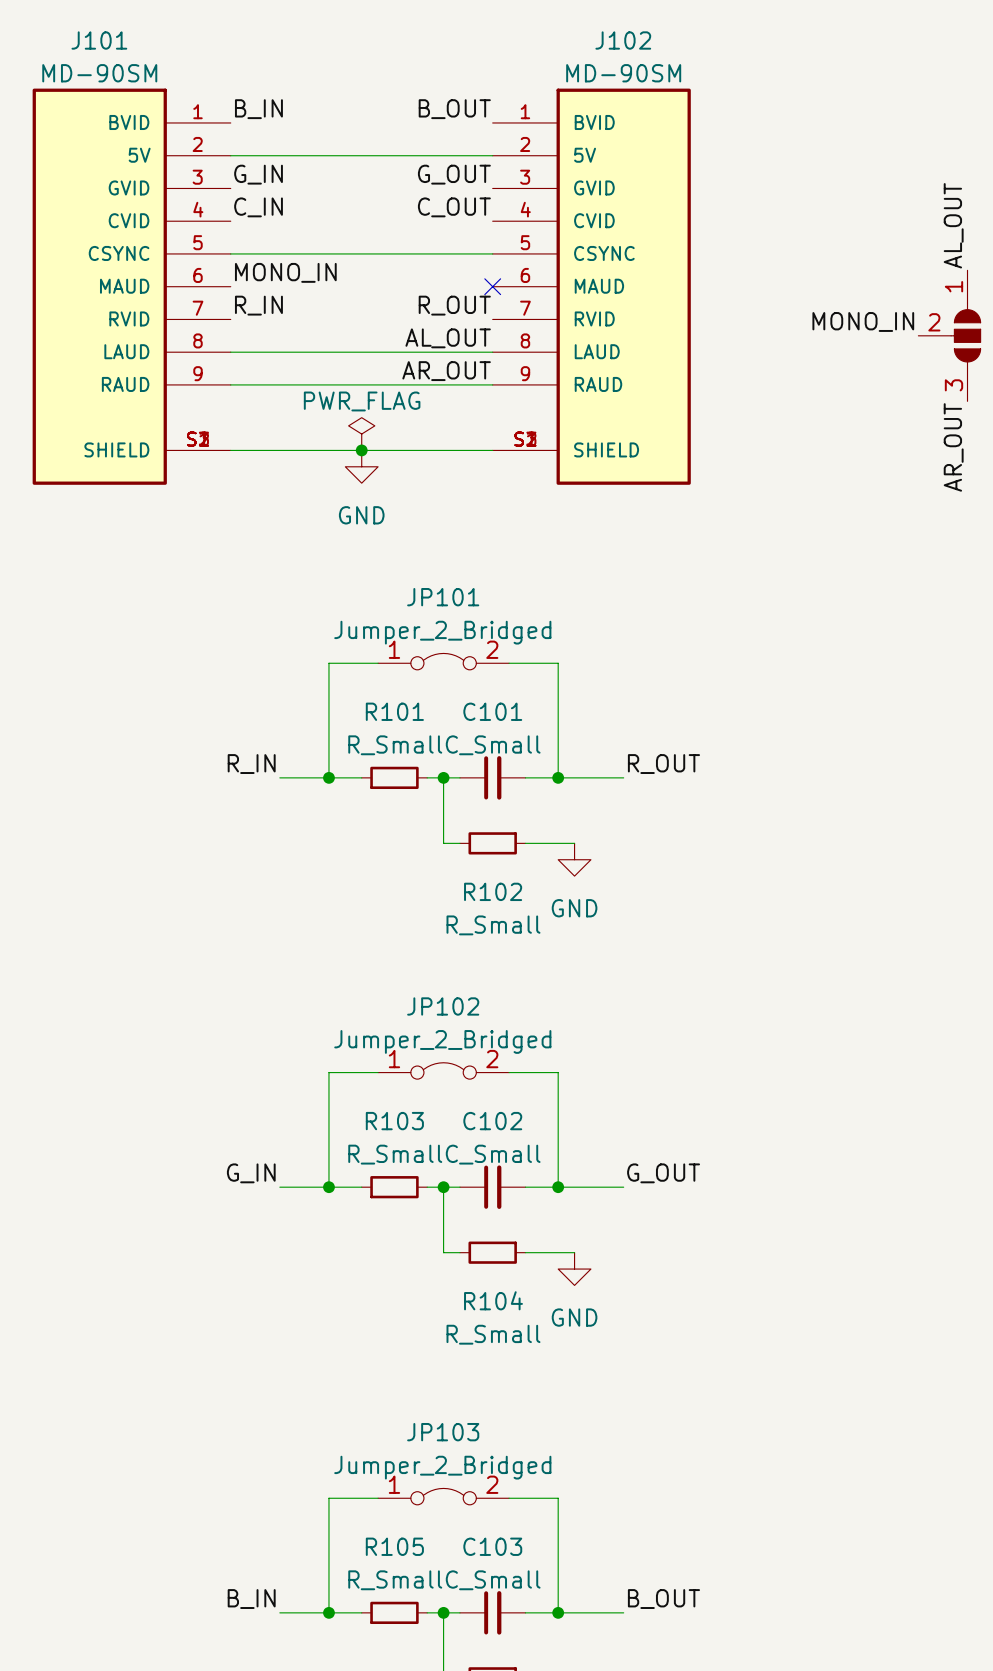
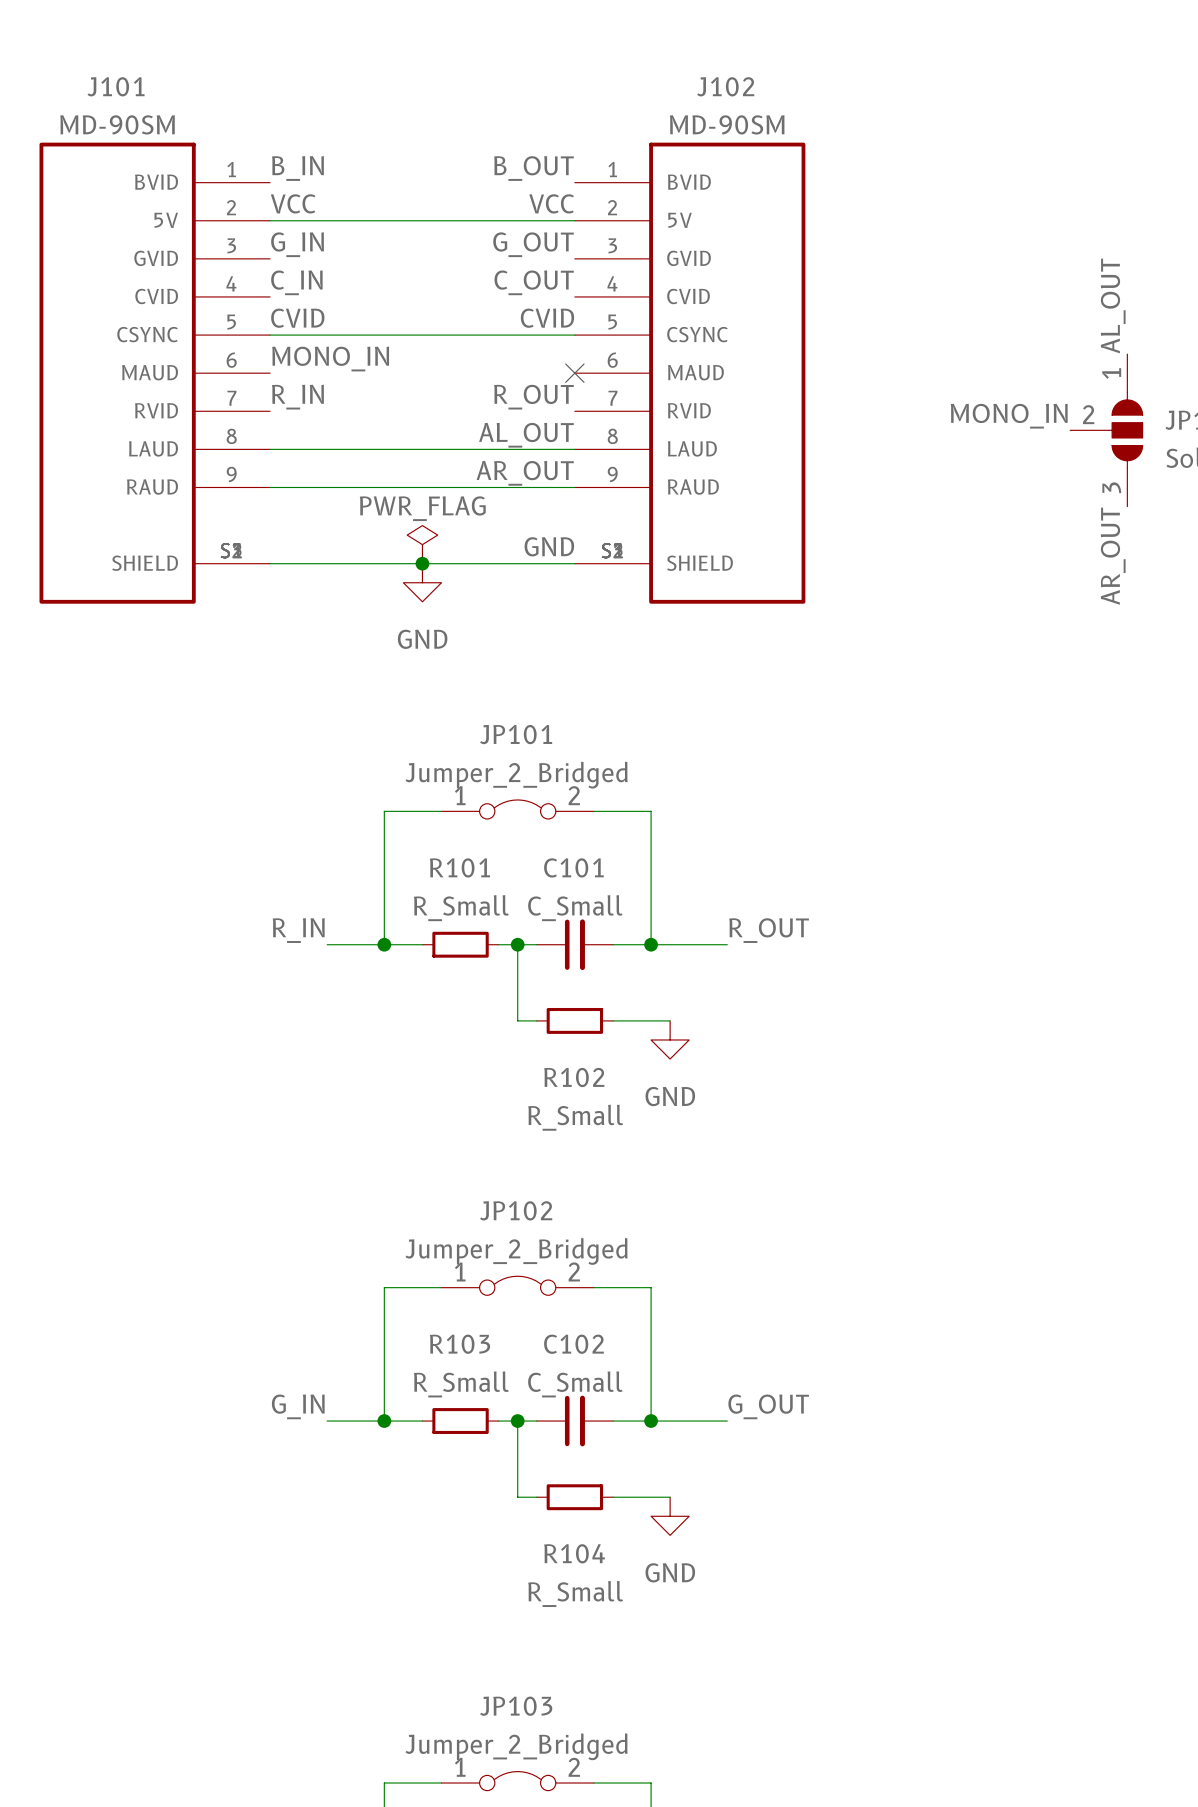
label: none -> VCC (293, 203)
label: none -> VCC (551, 203)
label: none -> CVID (297, 318)
label: none -> CVID (547, 318)
label: none -> GND (549, 546)

